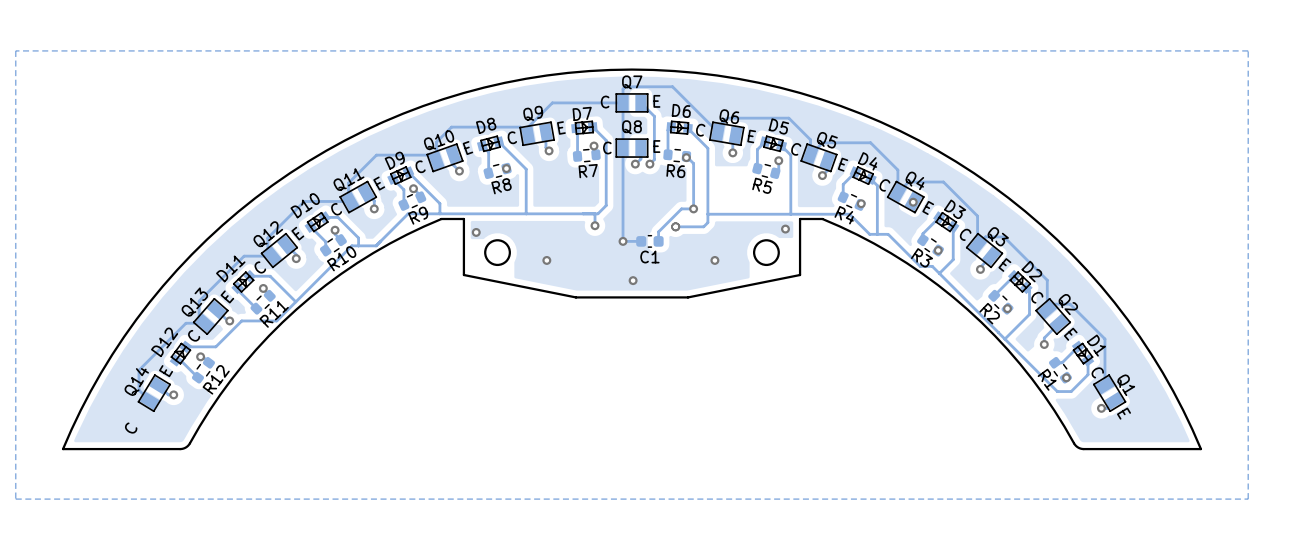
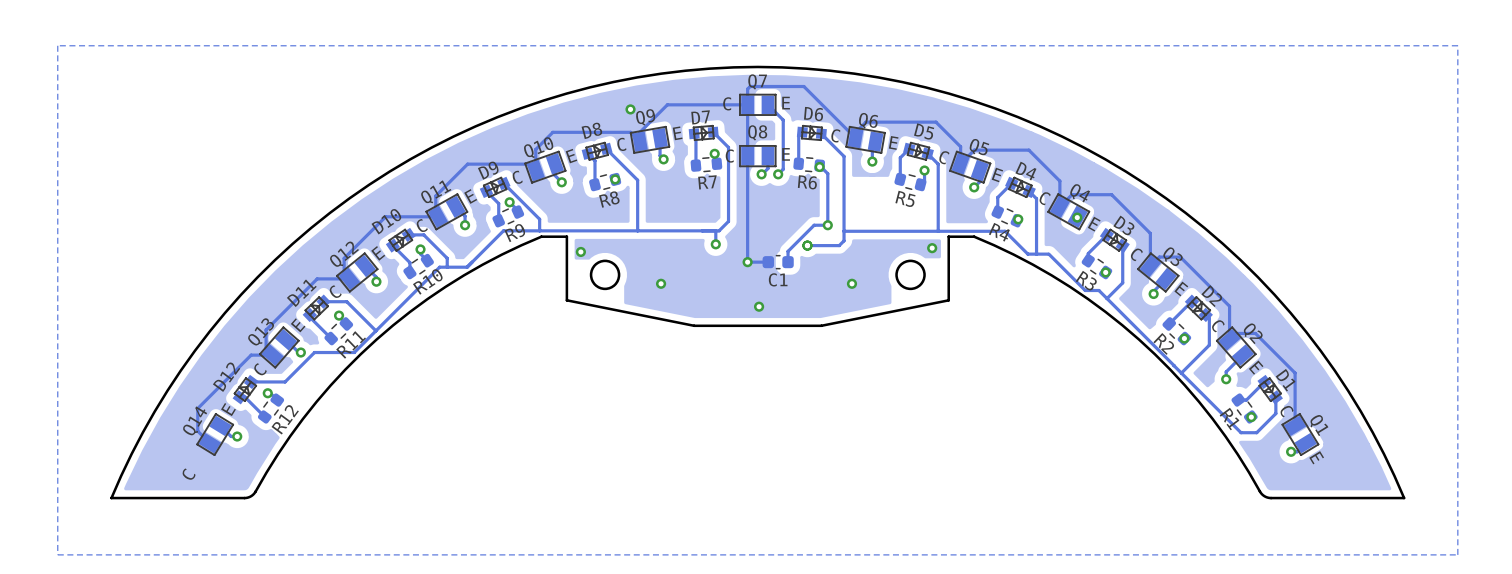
via: none -> (630, 109)

